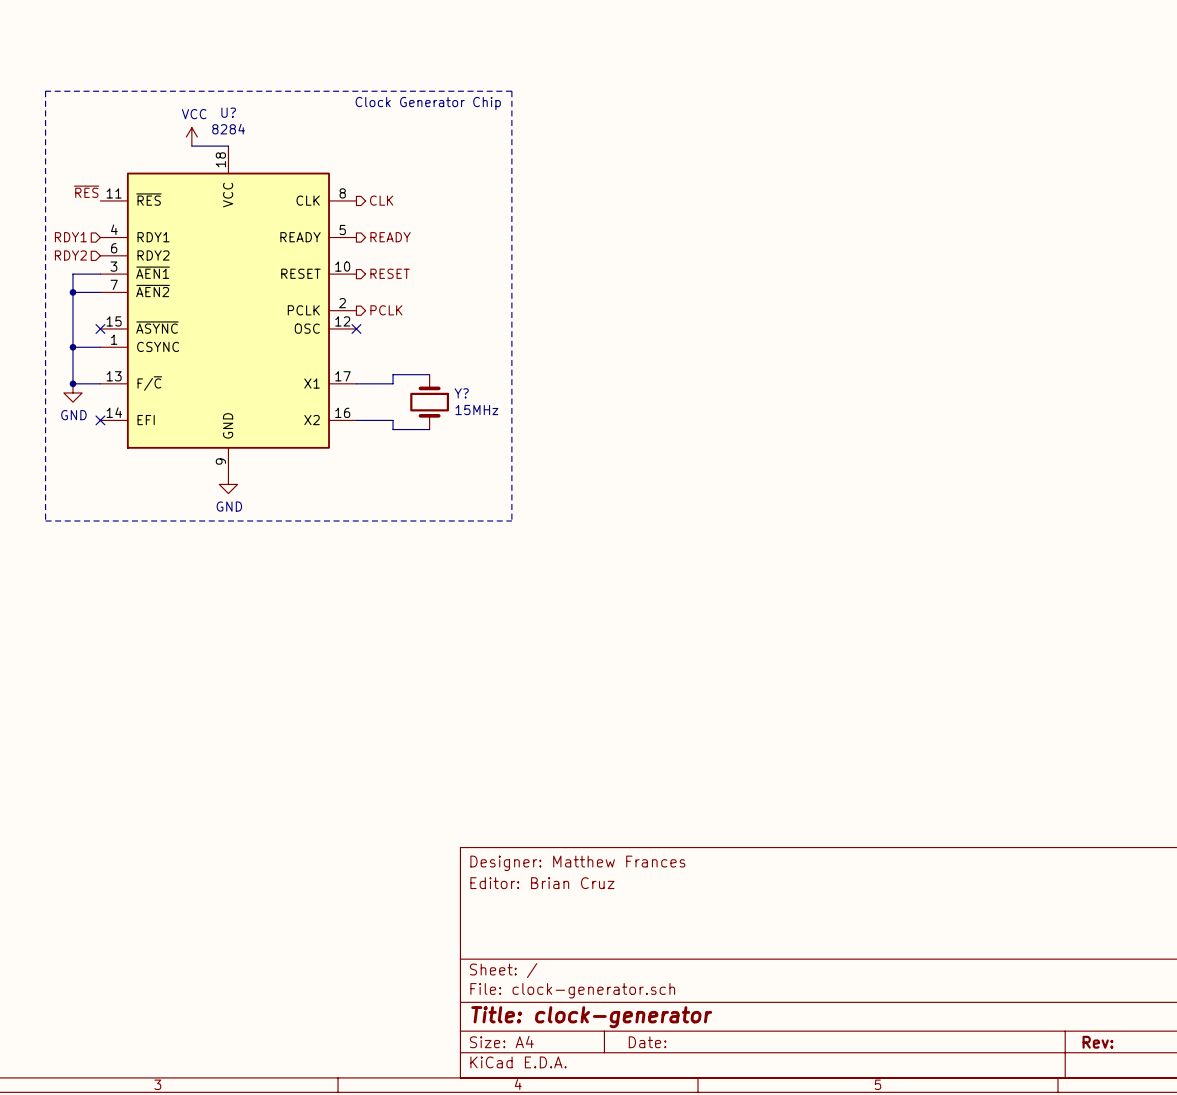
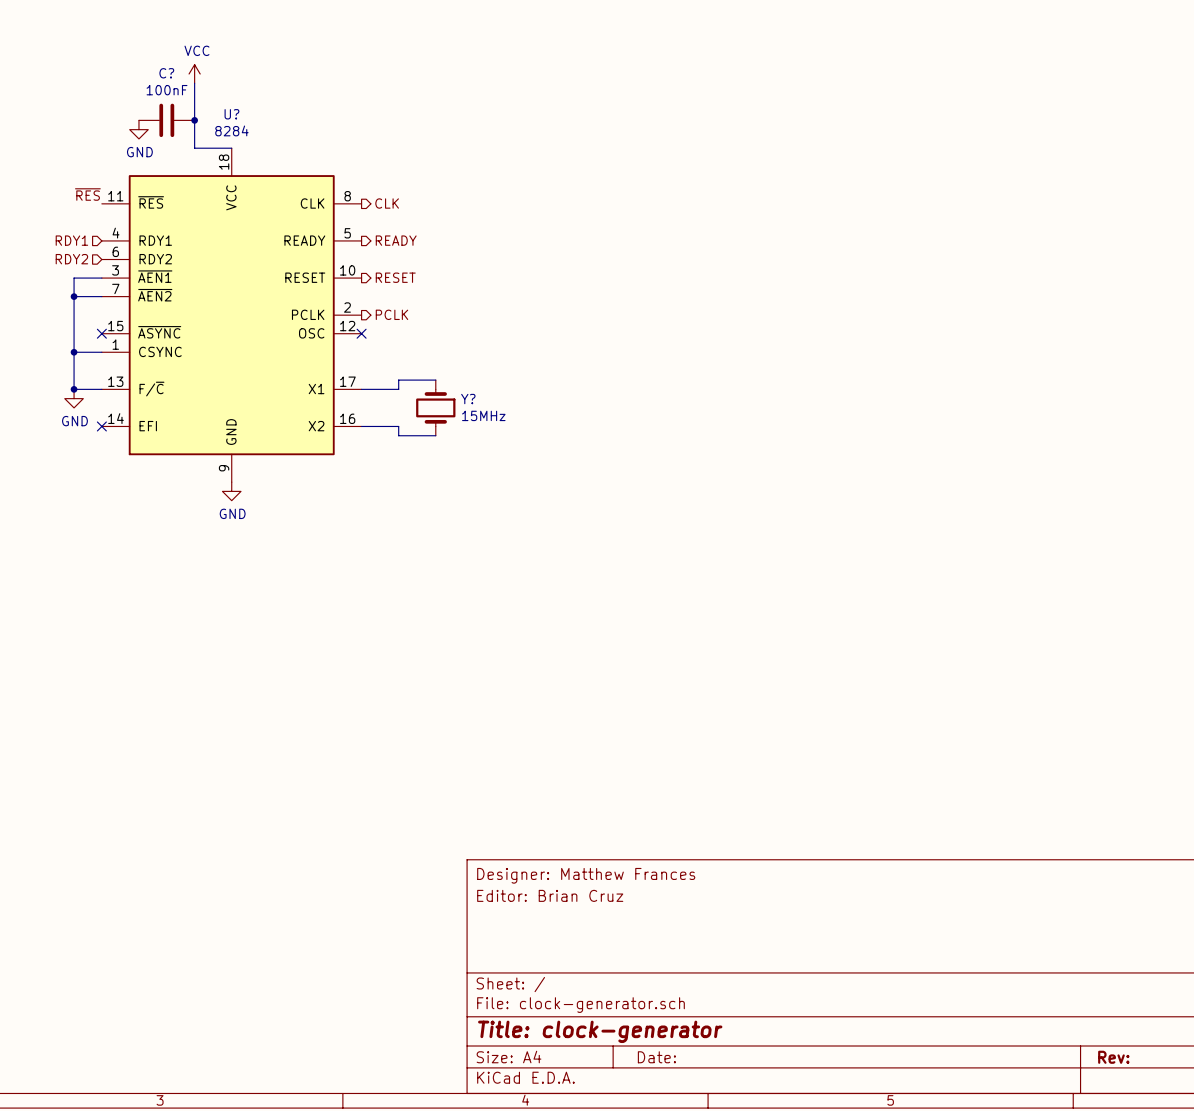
wire: none -> (194, 83) (194, 148)
line: (45, 91) (511, 91) (511, 520) (45, 520) (45, 91) -> none
text: Clock Generator Chip (428, 103) -> none
C?: none -> 100nF (166, 120)
junction: none -> (194, 120)
power symbol: none -> GND (138, 129)
power symbol position: VCC (191, 136) -> VCC (194, 74)

